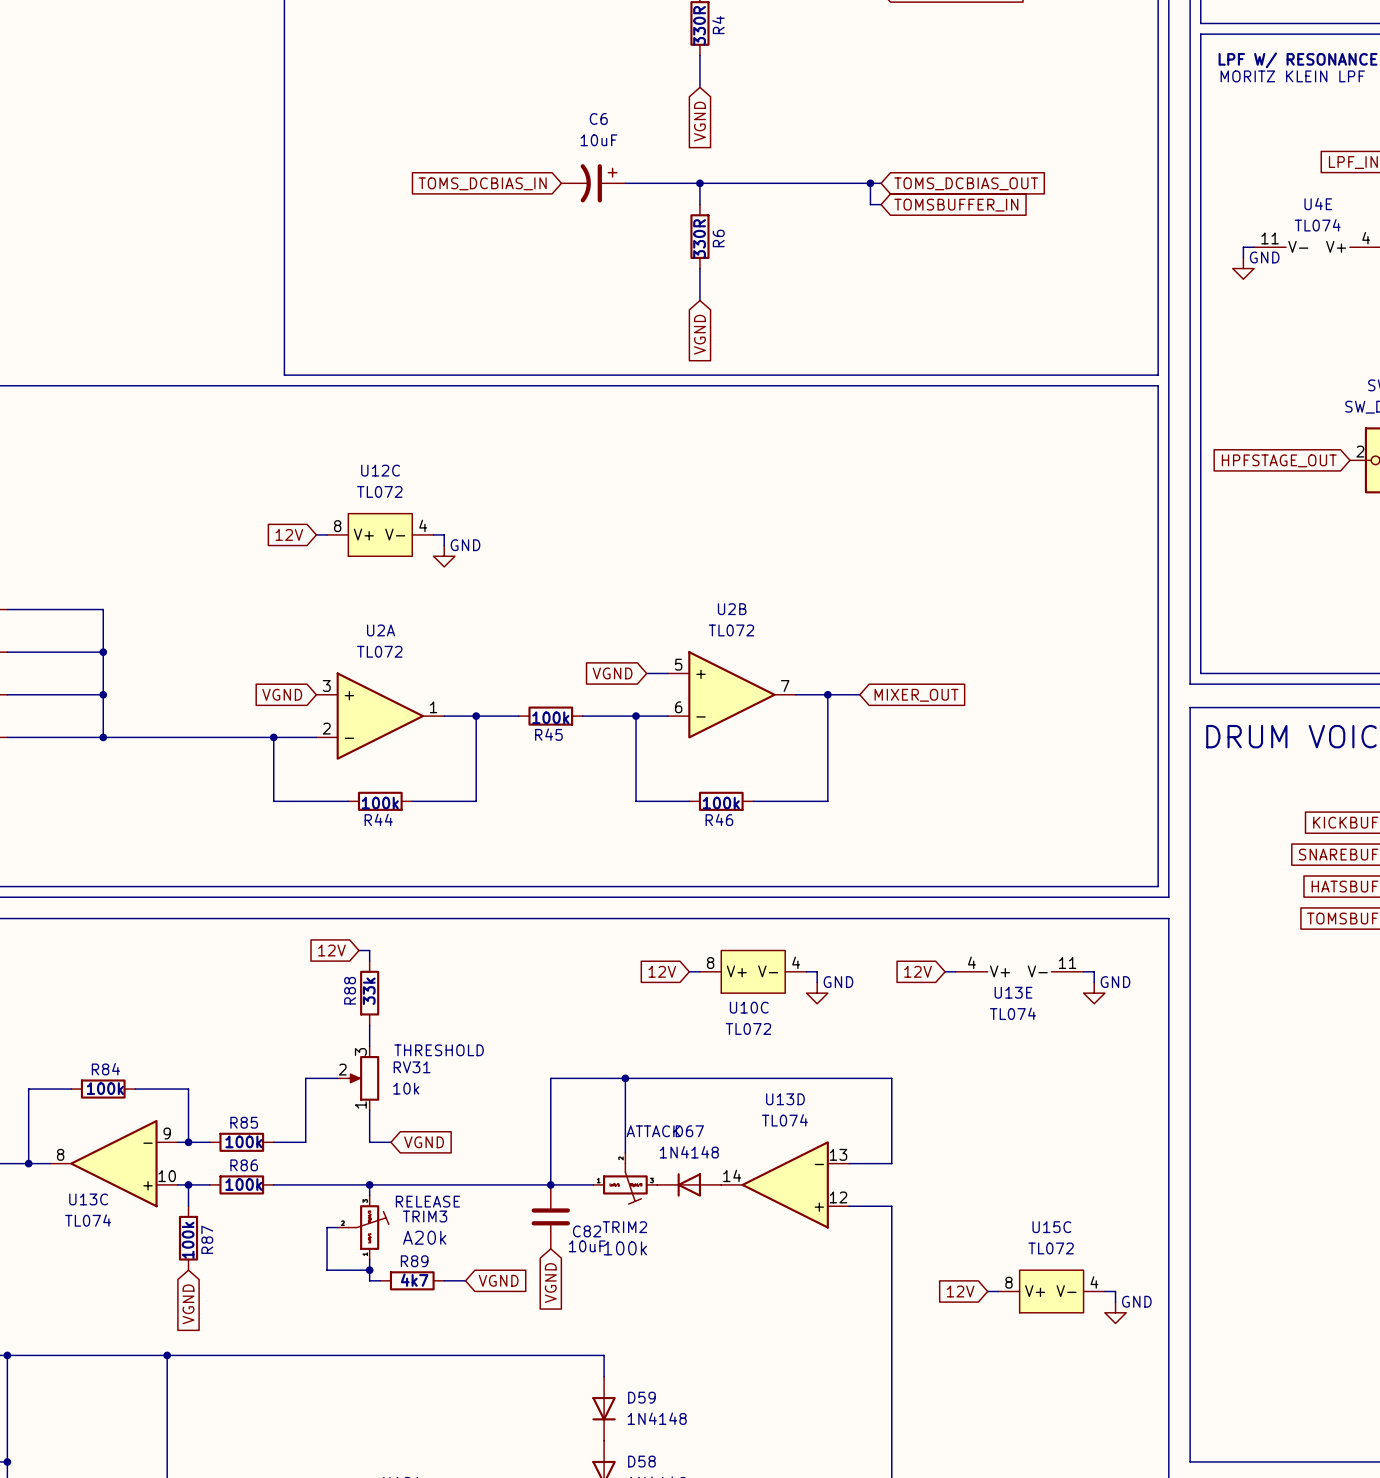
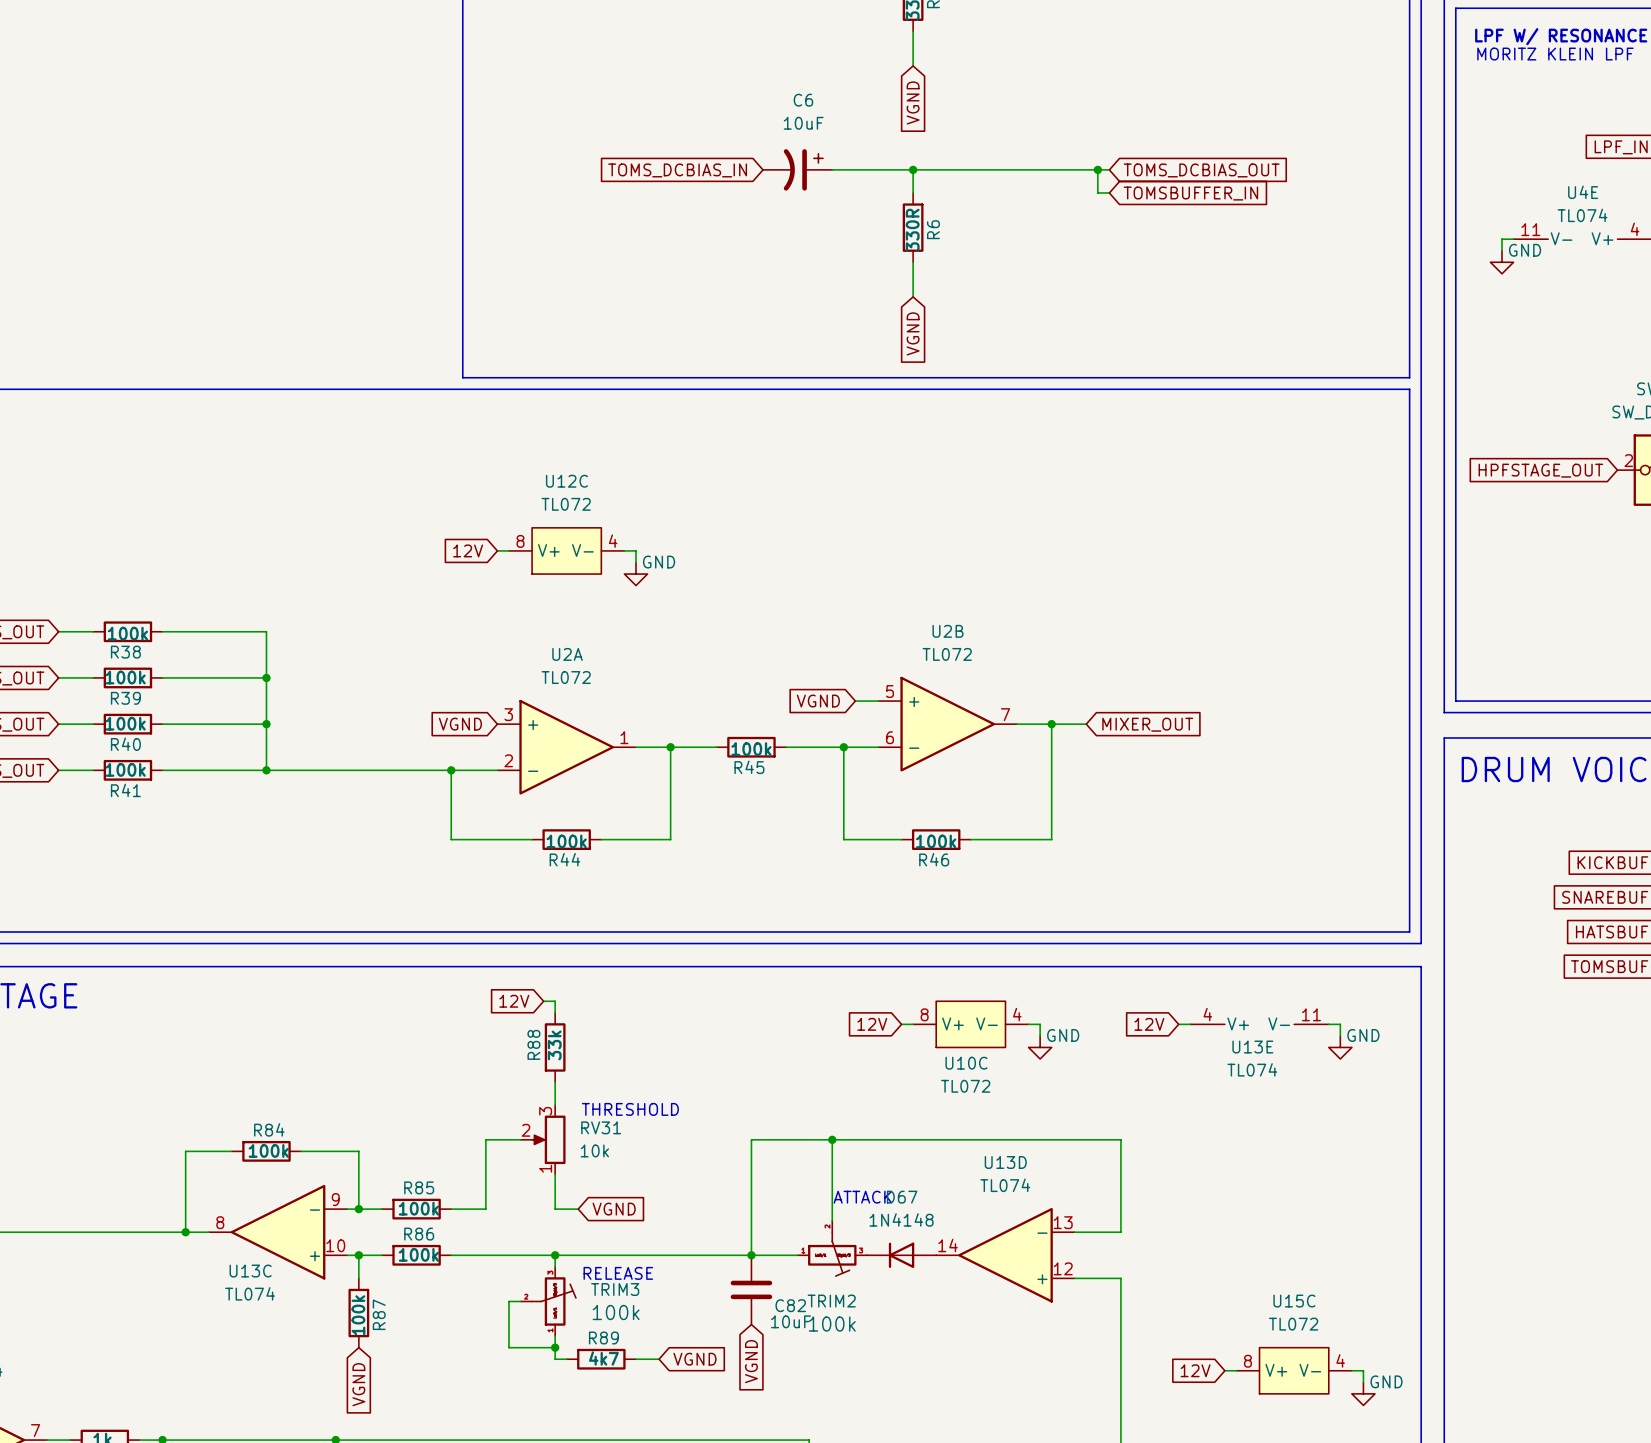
TRIM3 text: A20k (424, 1237) -> 100k (616, 1312)

